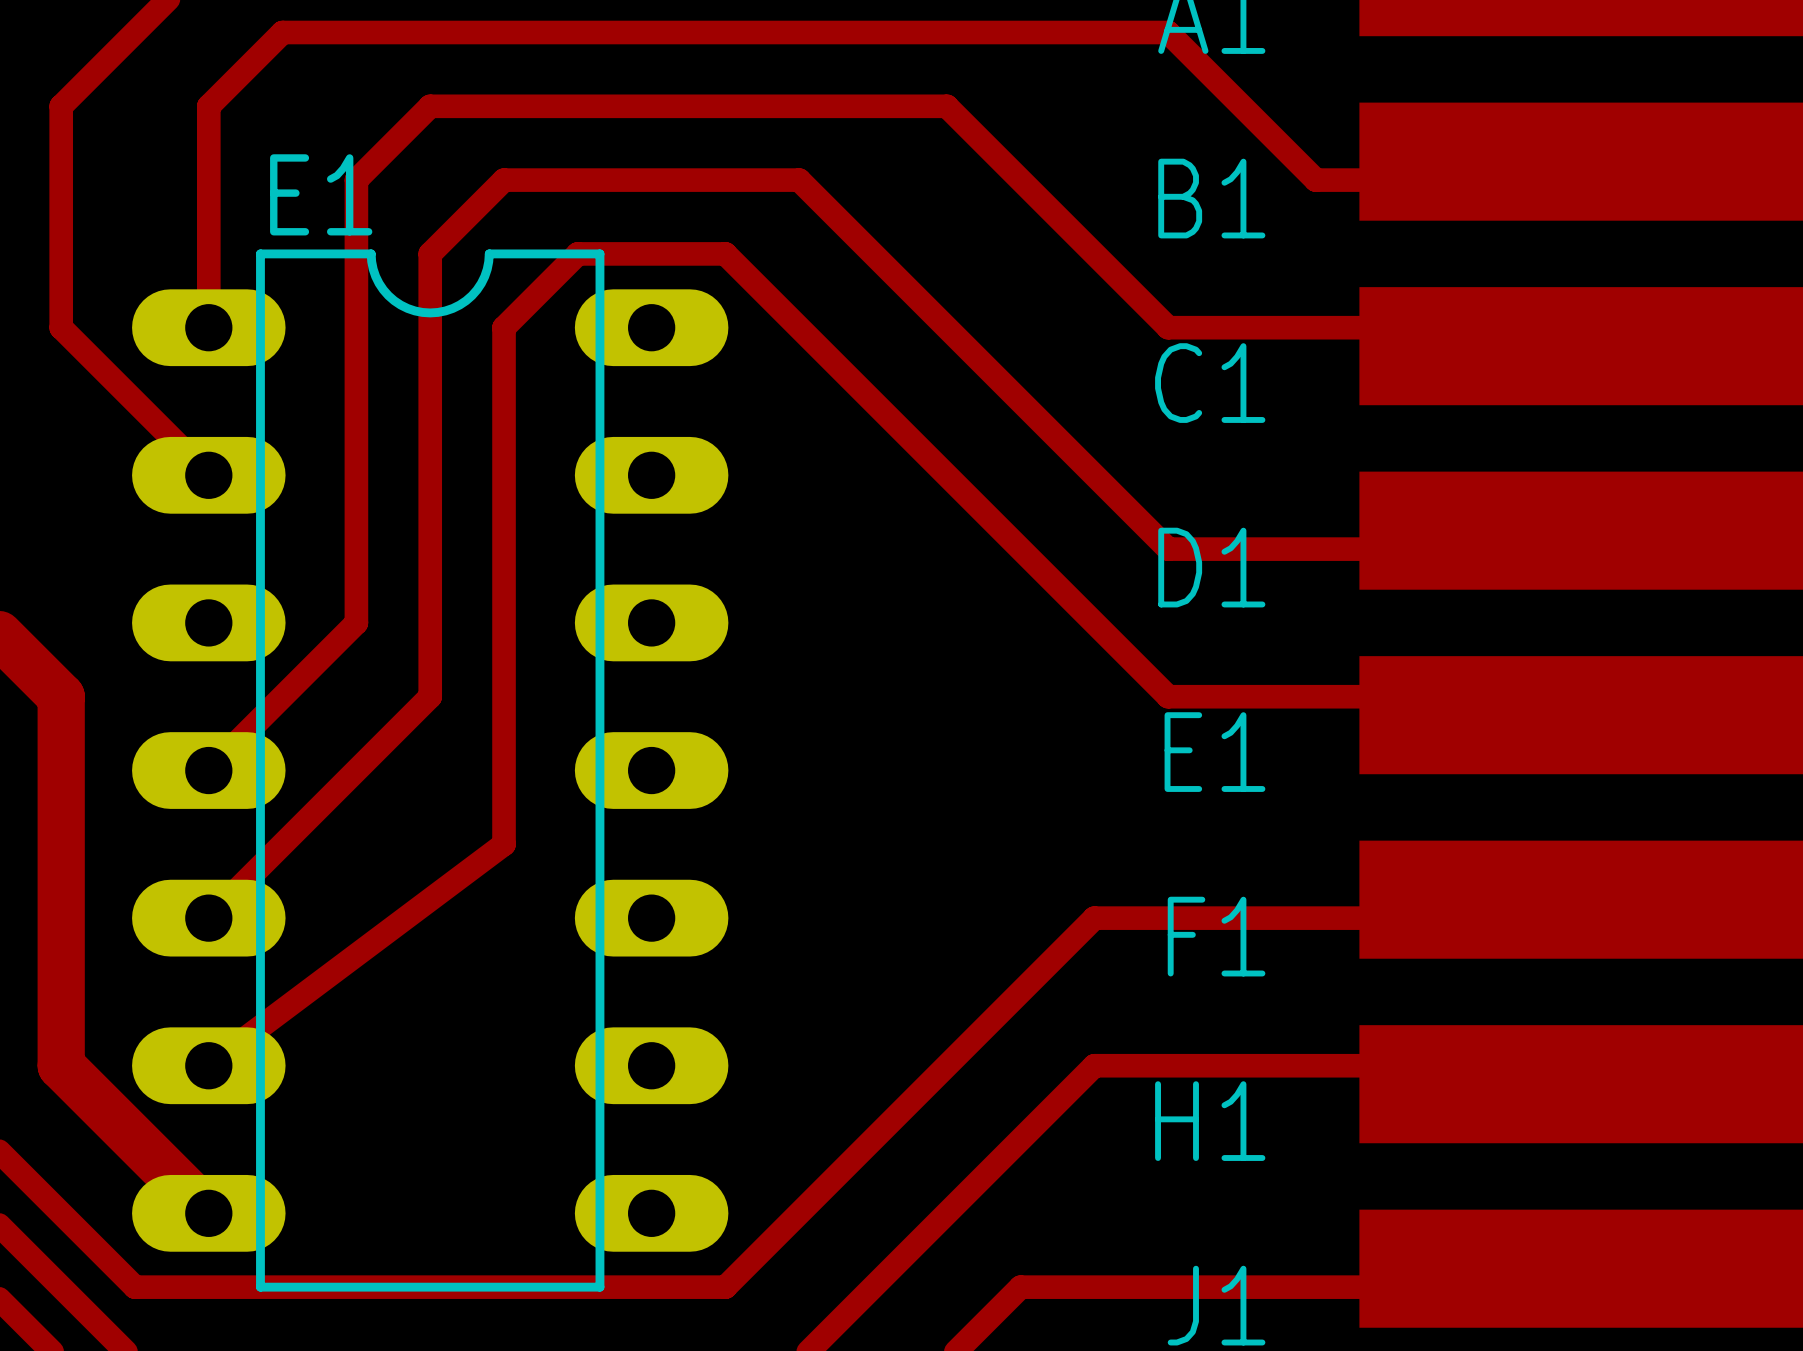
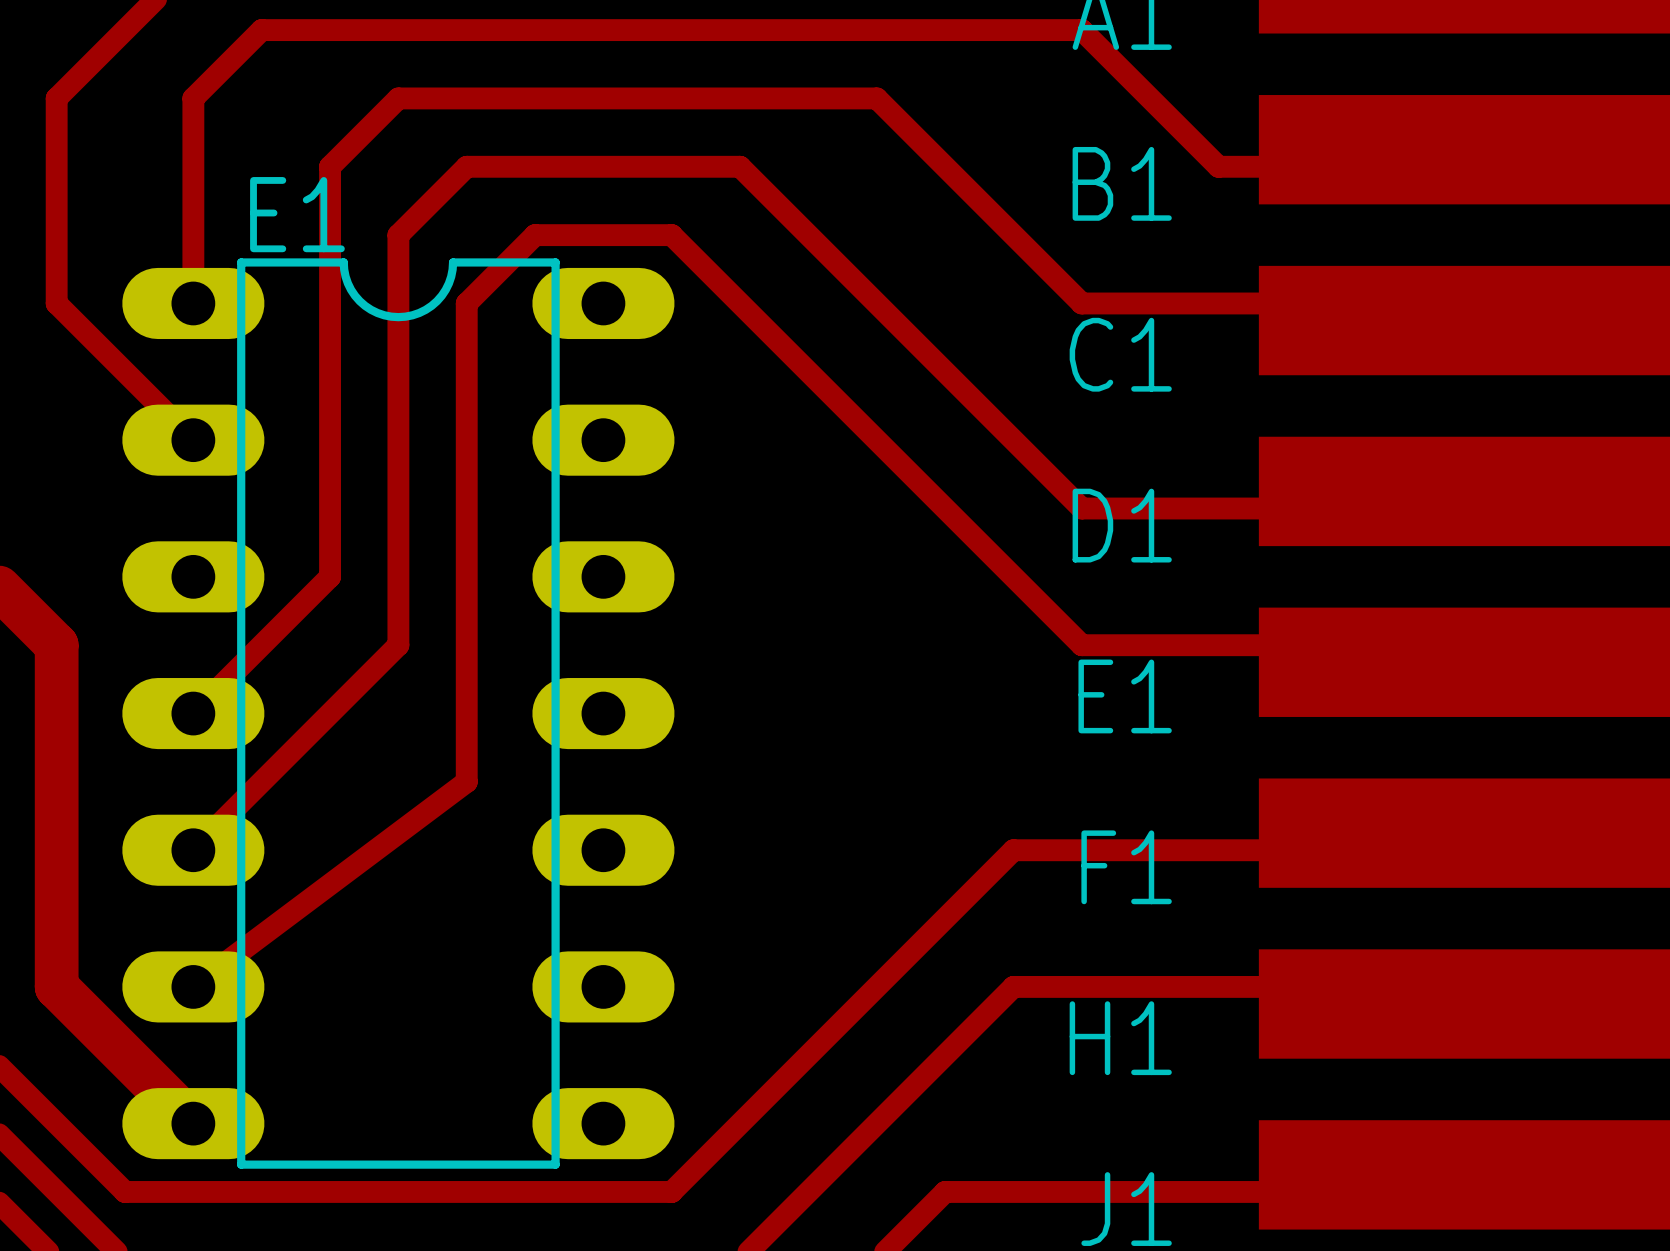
E1 name position: E1 (321, 194) -> E1 (297, 214)
E1 footprint: [132, 249, 729, 1292] -> [122, 258, 675, 1169]

